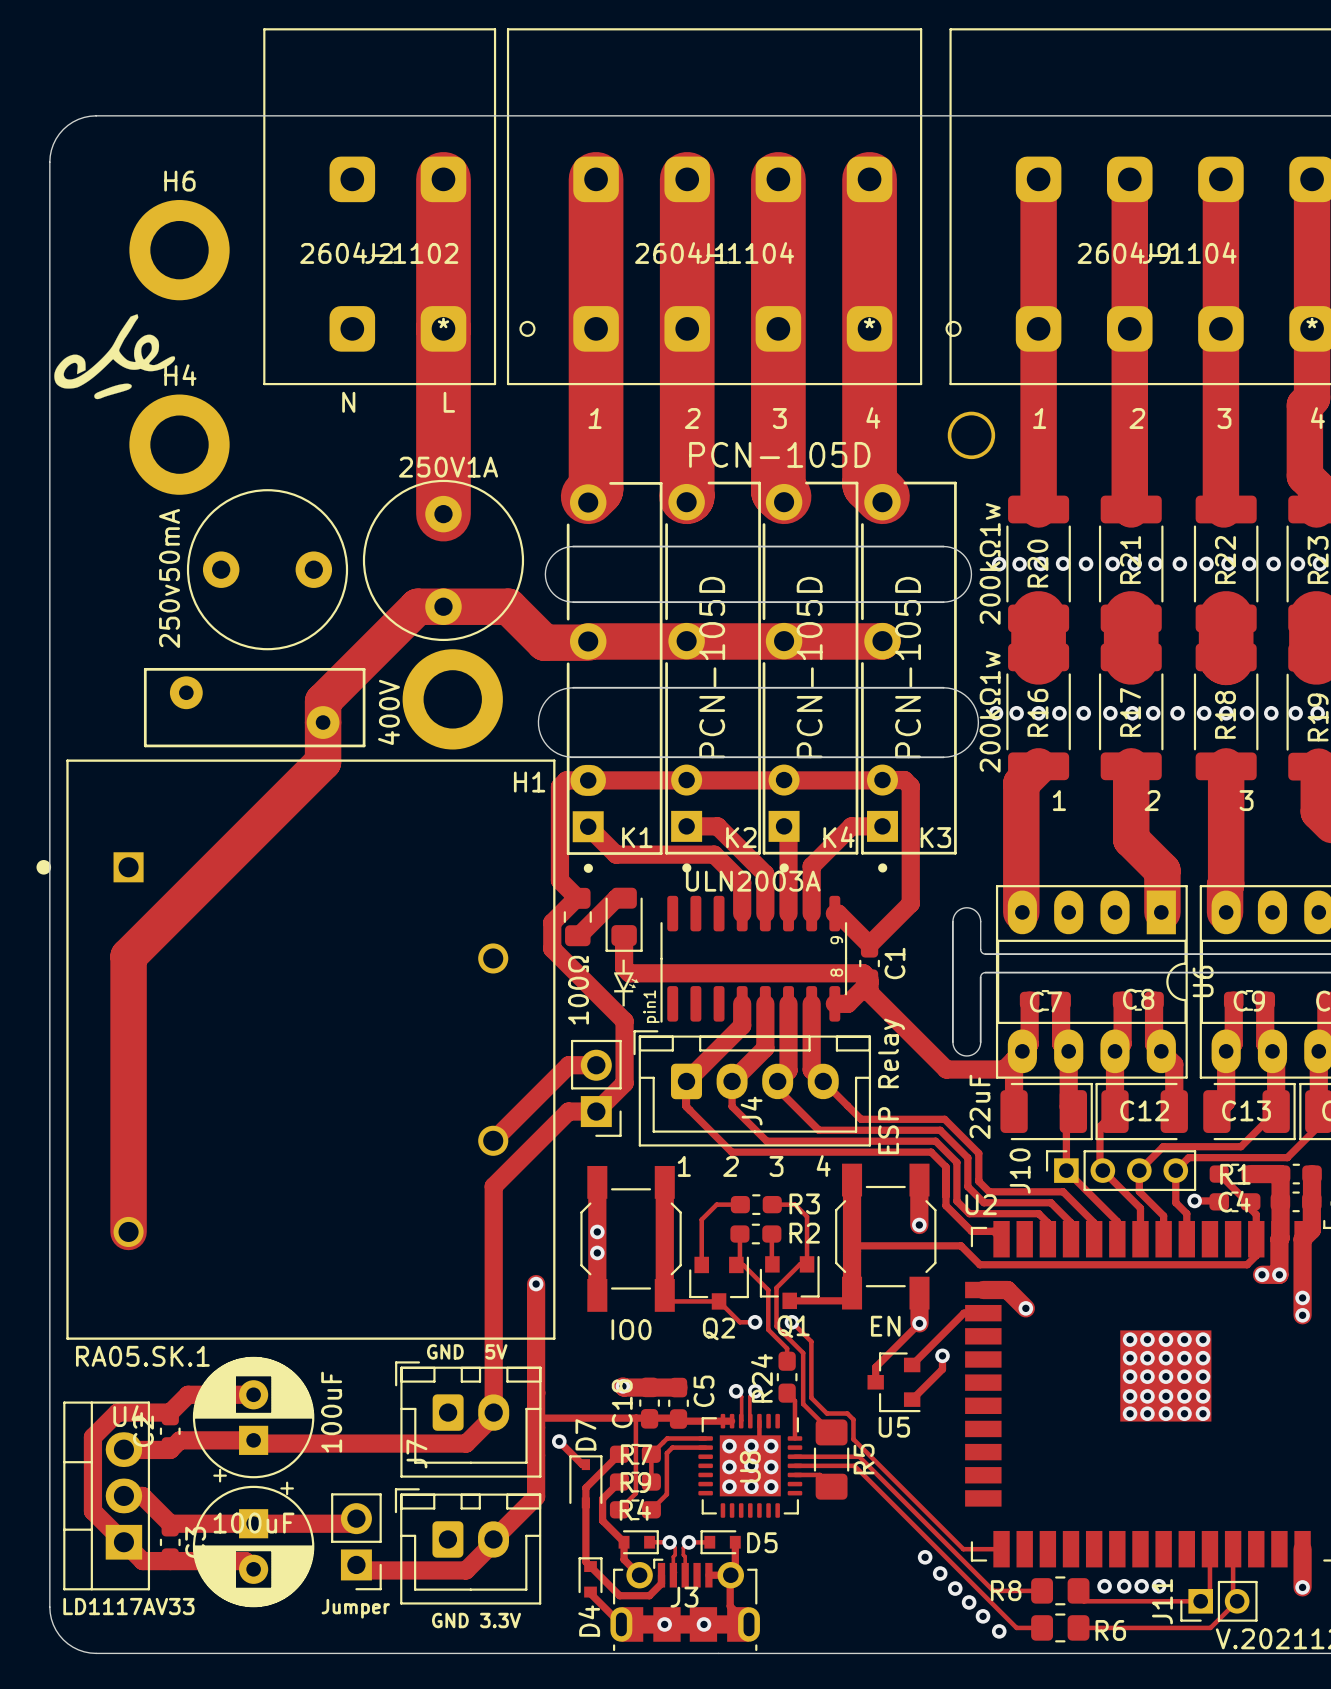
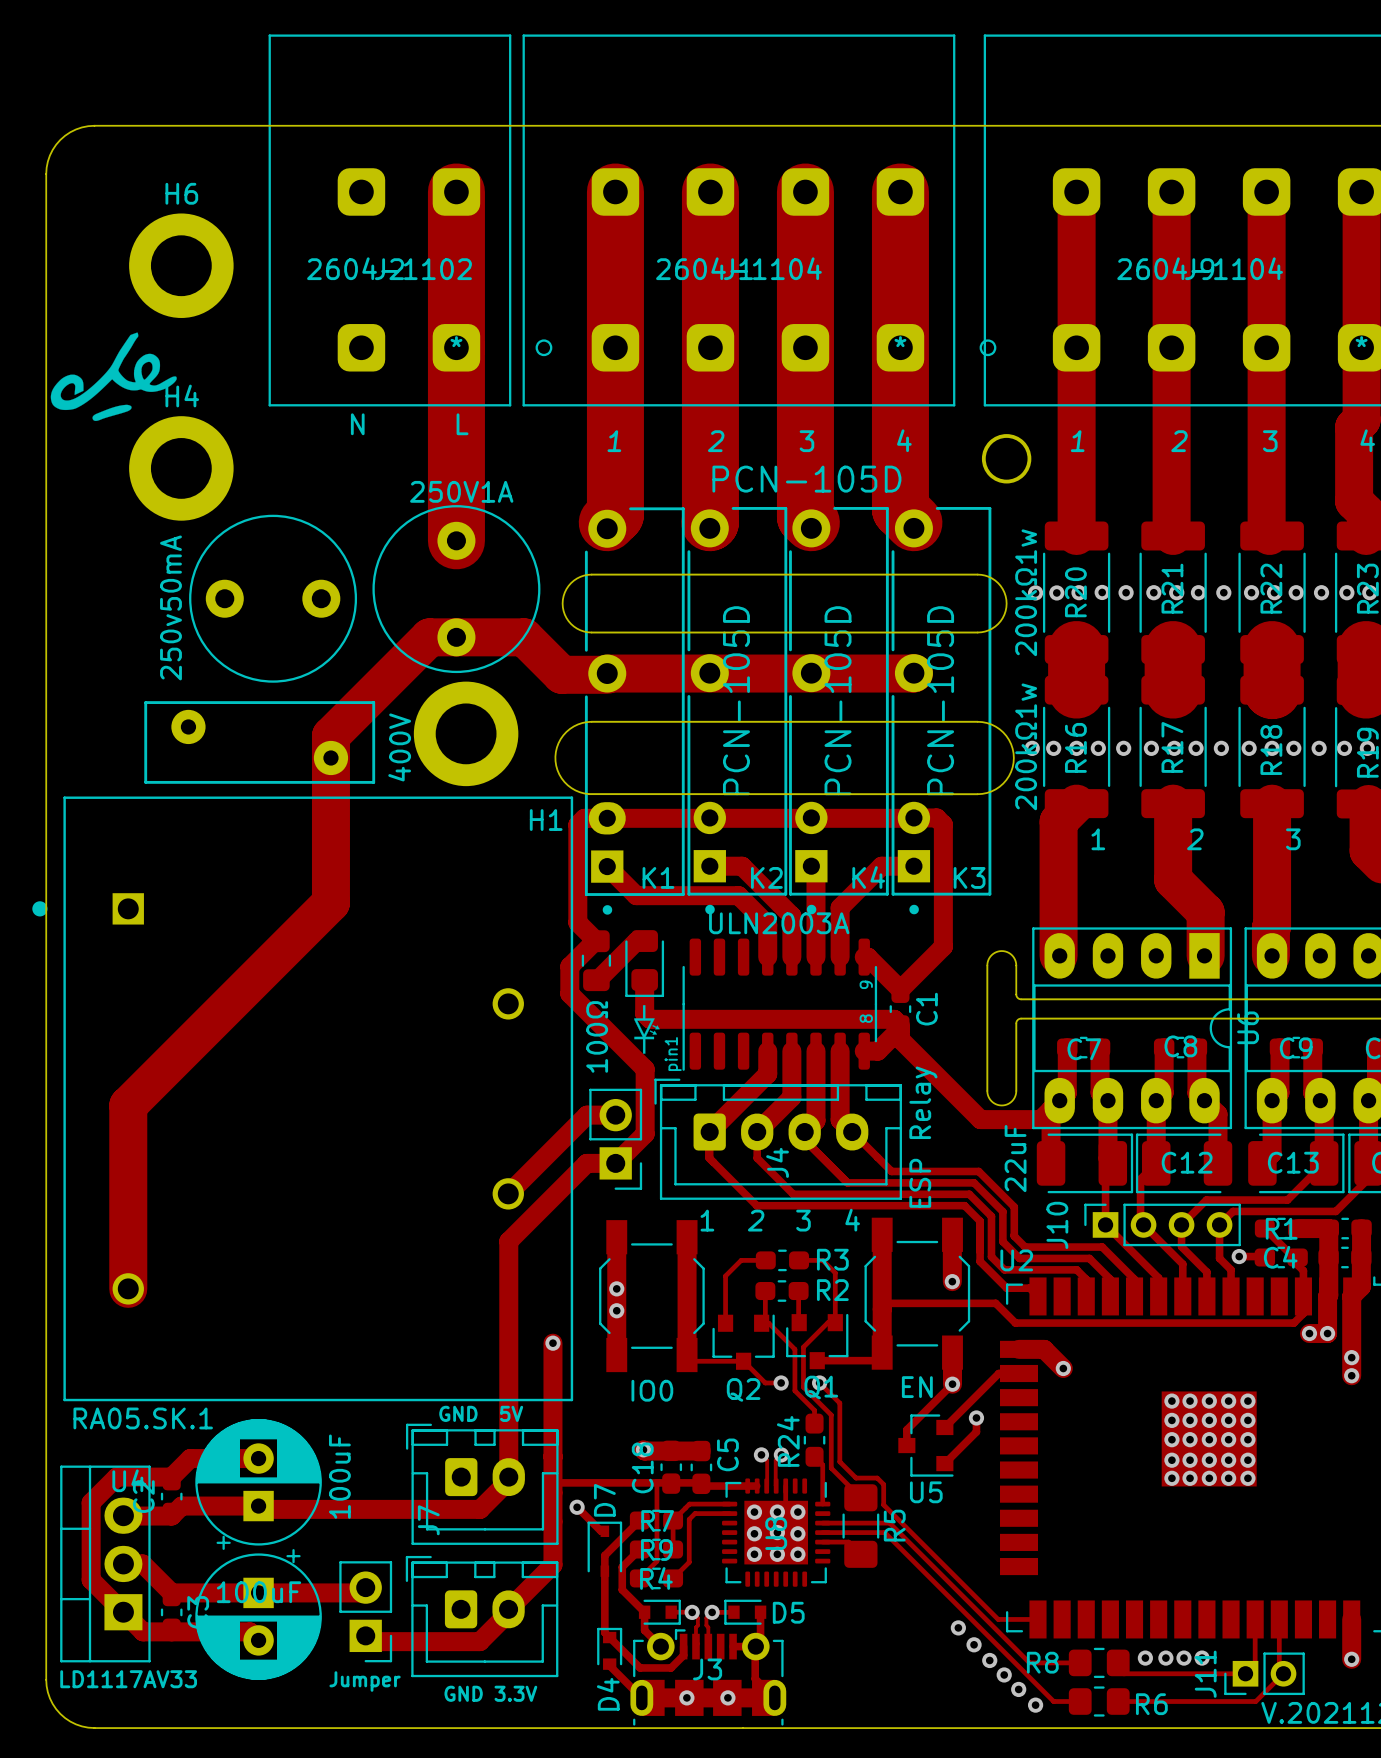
track: (323, 761) (128, 956) (128, 1055) -> (330, 799) (330, 902) (128, 1105)

